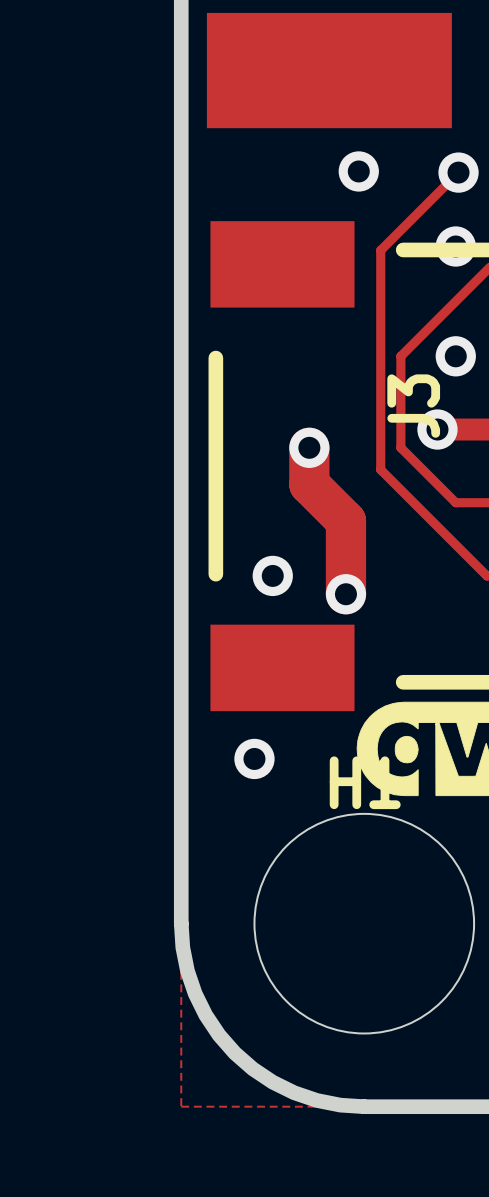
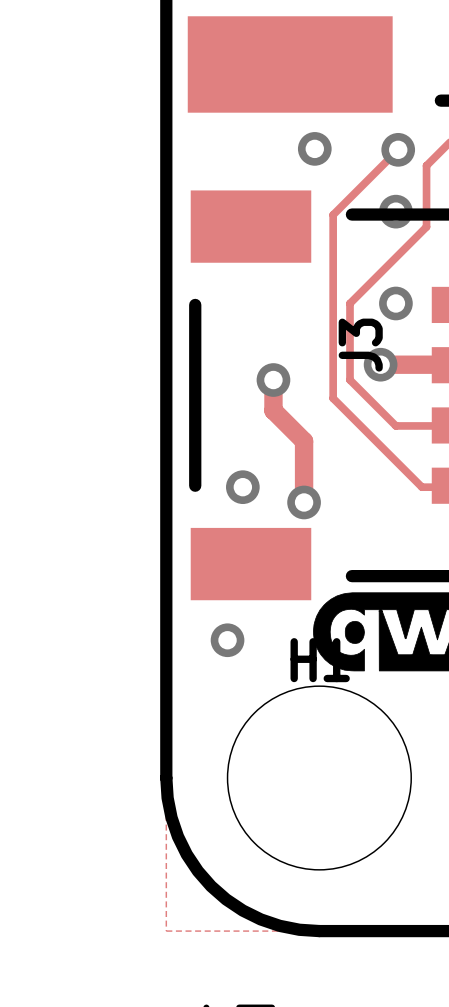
track width: thick (309, 447) (309, 484) (345, 521) (345, 594) -> thin (273, 380) (273, 410) (304, 441) (304, 502)

